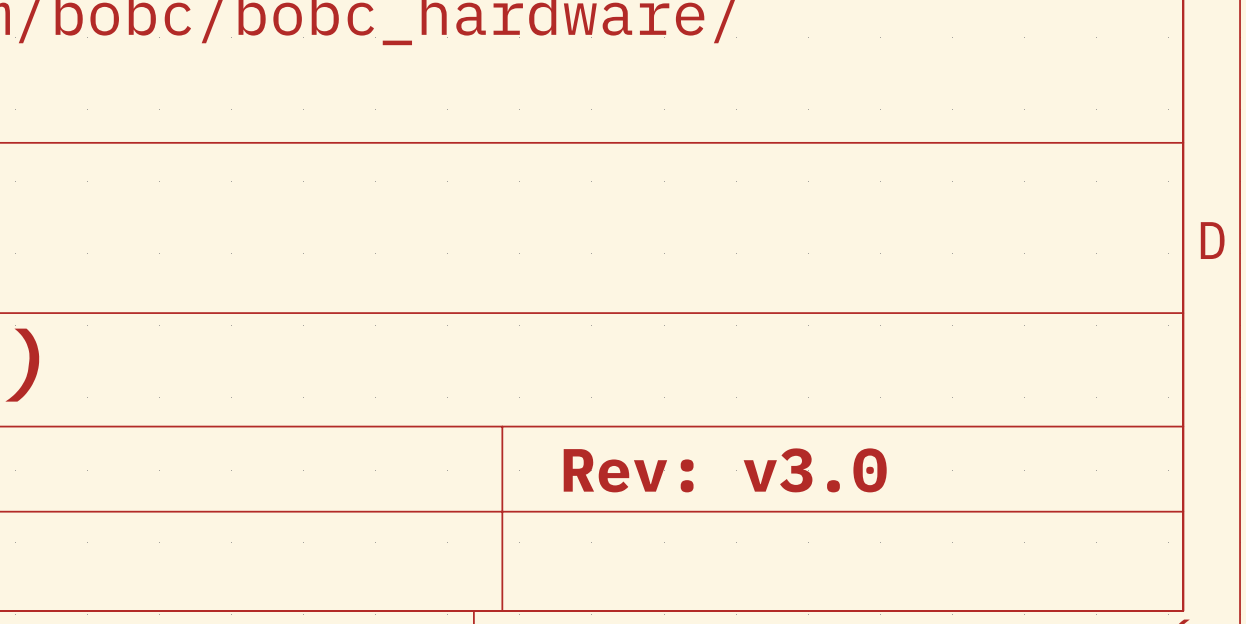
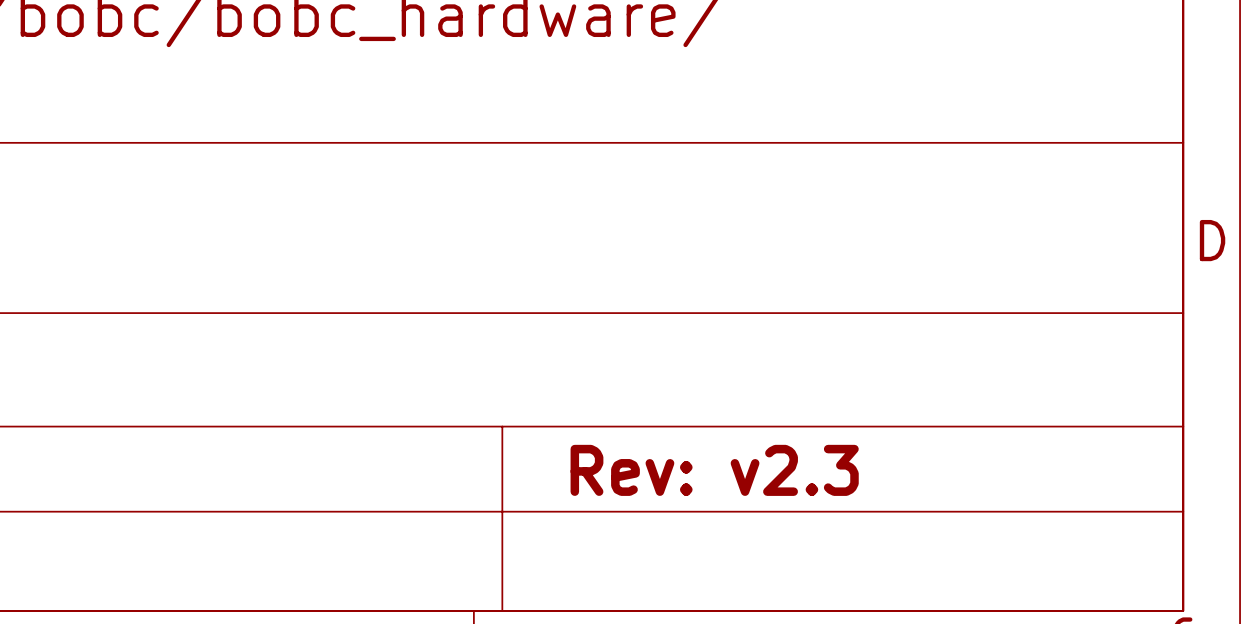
title block: Rev: v3.0 (725, 470) -> Rev: v2.3 (714, 470)

